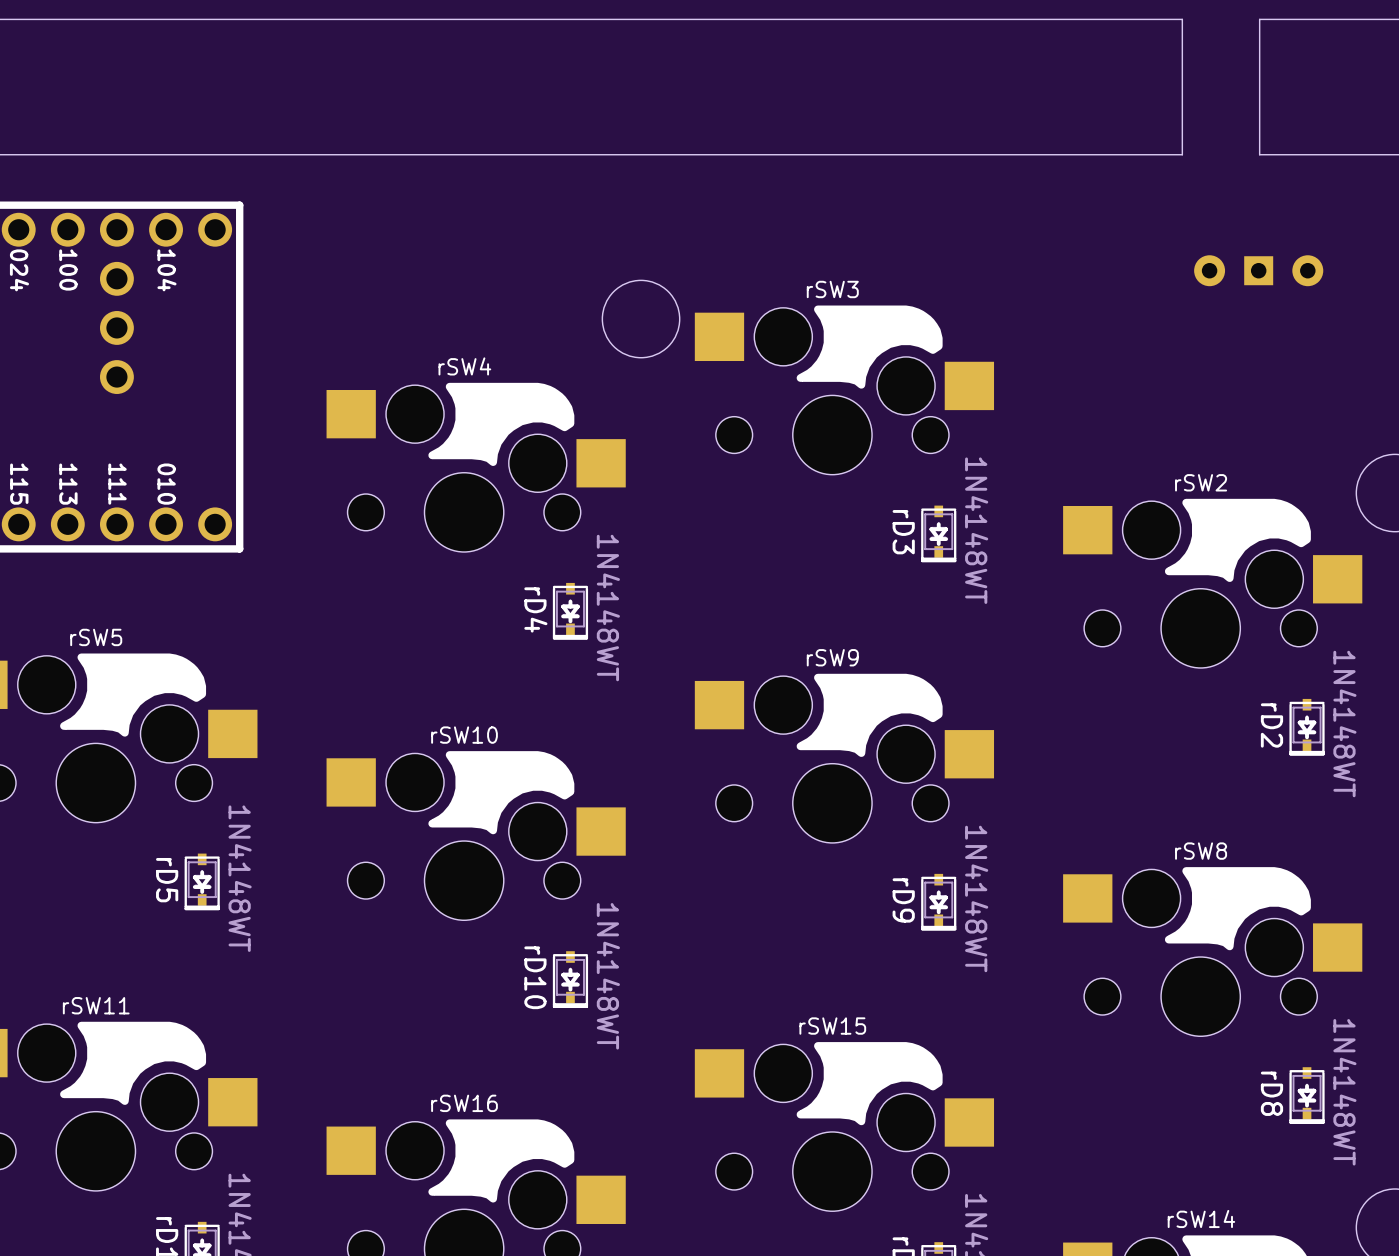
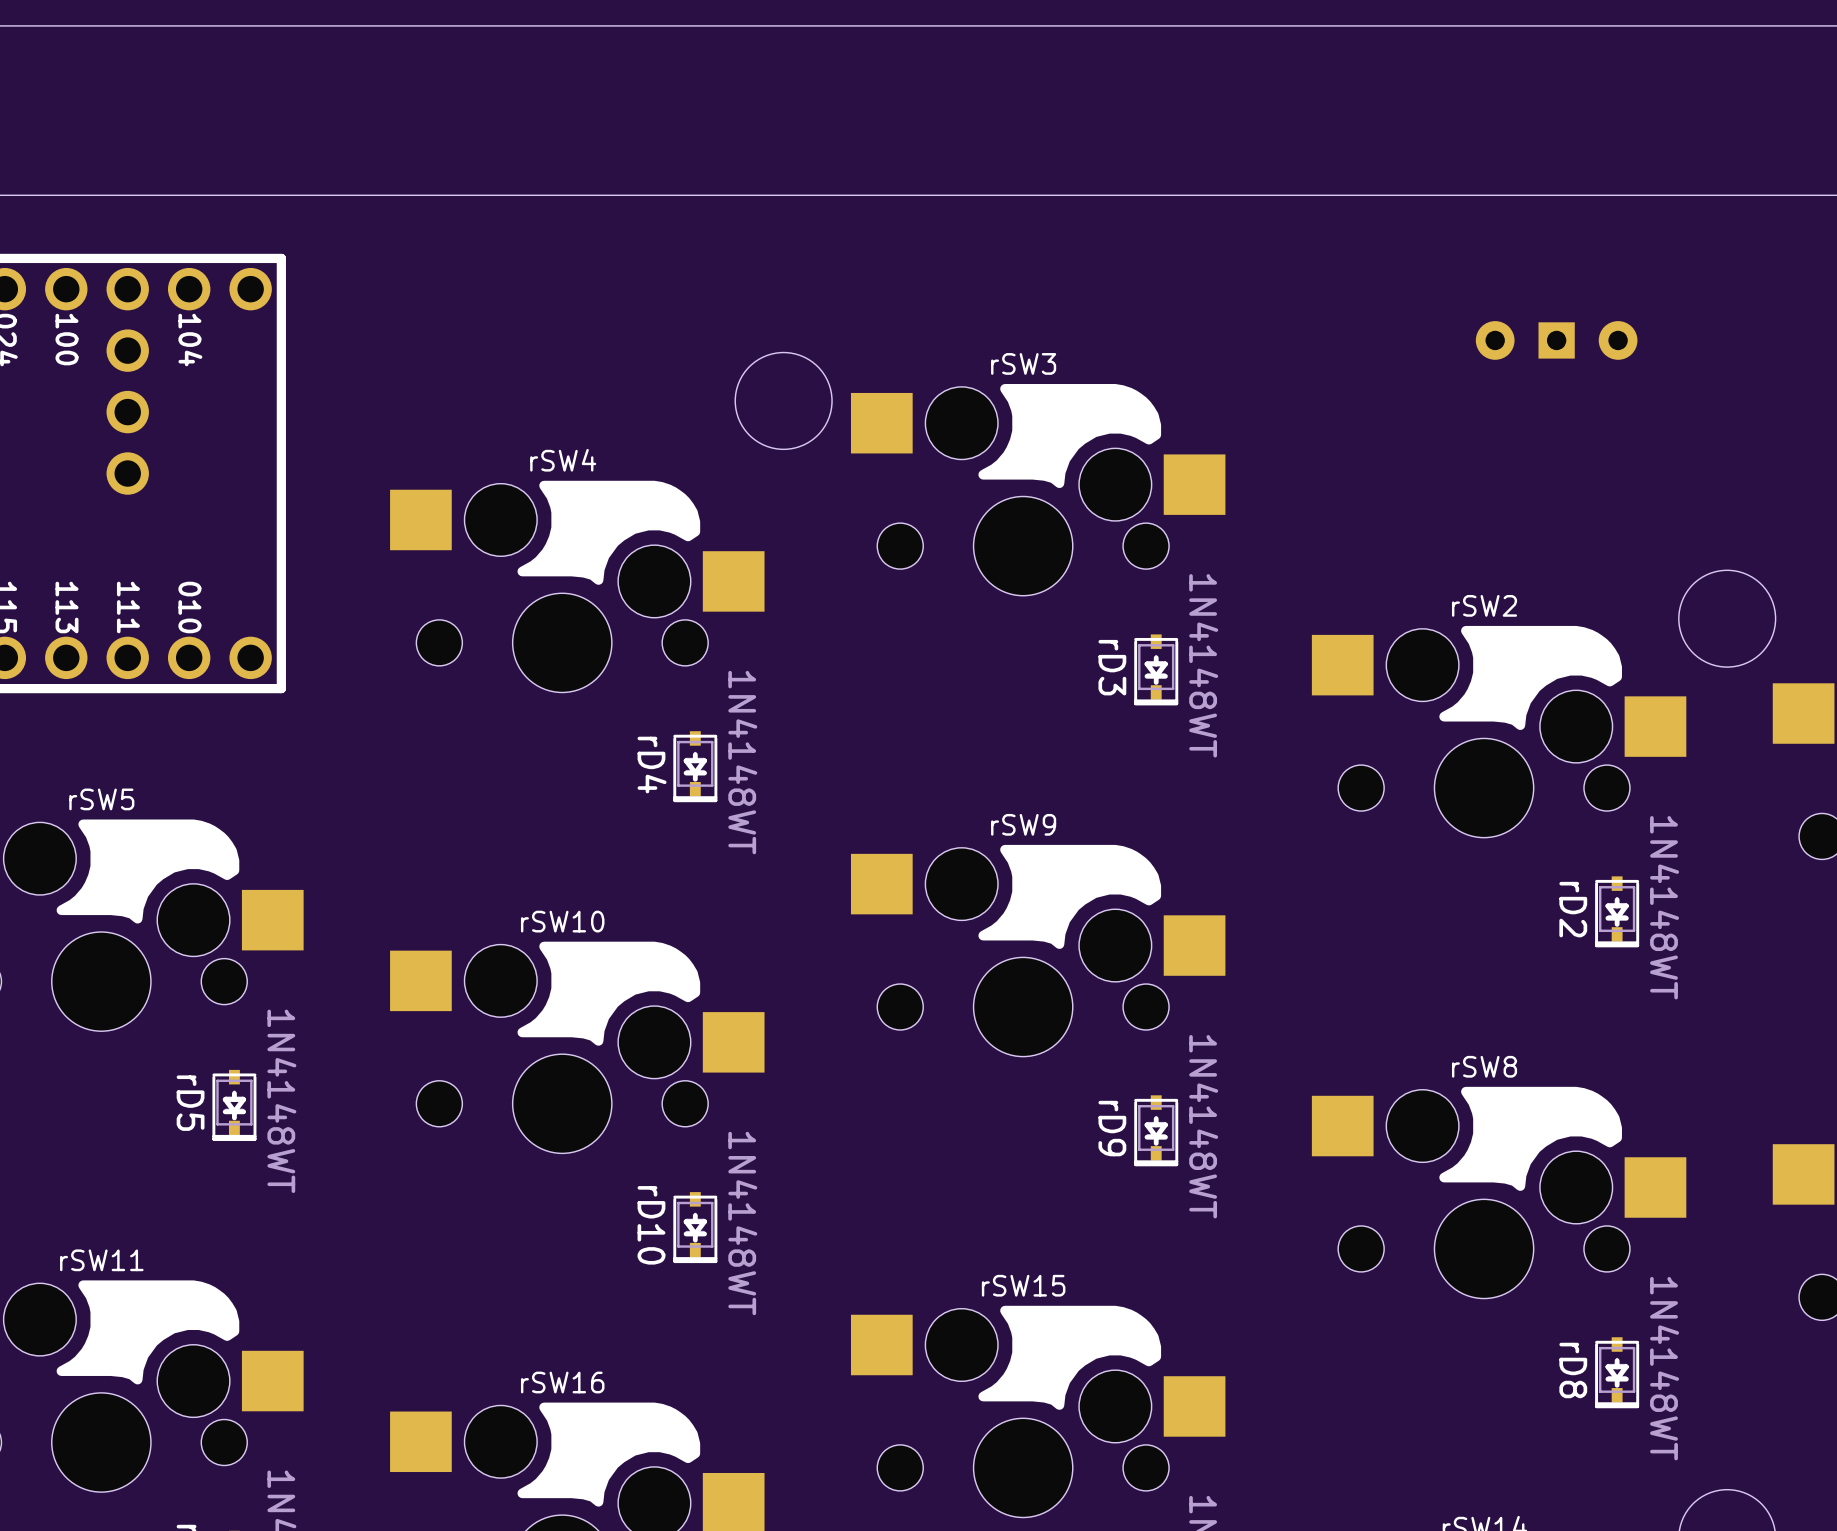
board edge: (1182, 19) (1182, 154) -> (1557, 195) (1461, 195)
board edge: (1259, 19) (1259, 154) -> (1557, 25) (1461, 25)

